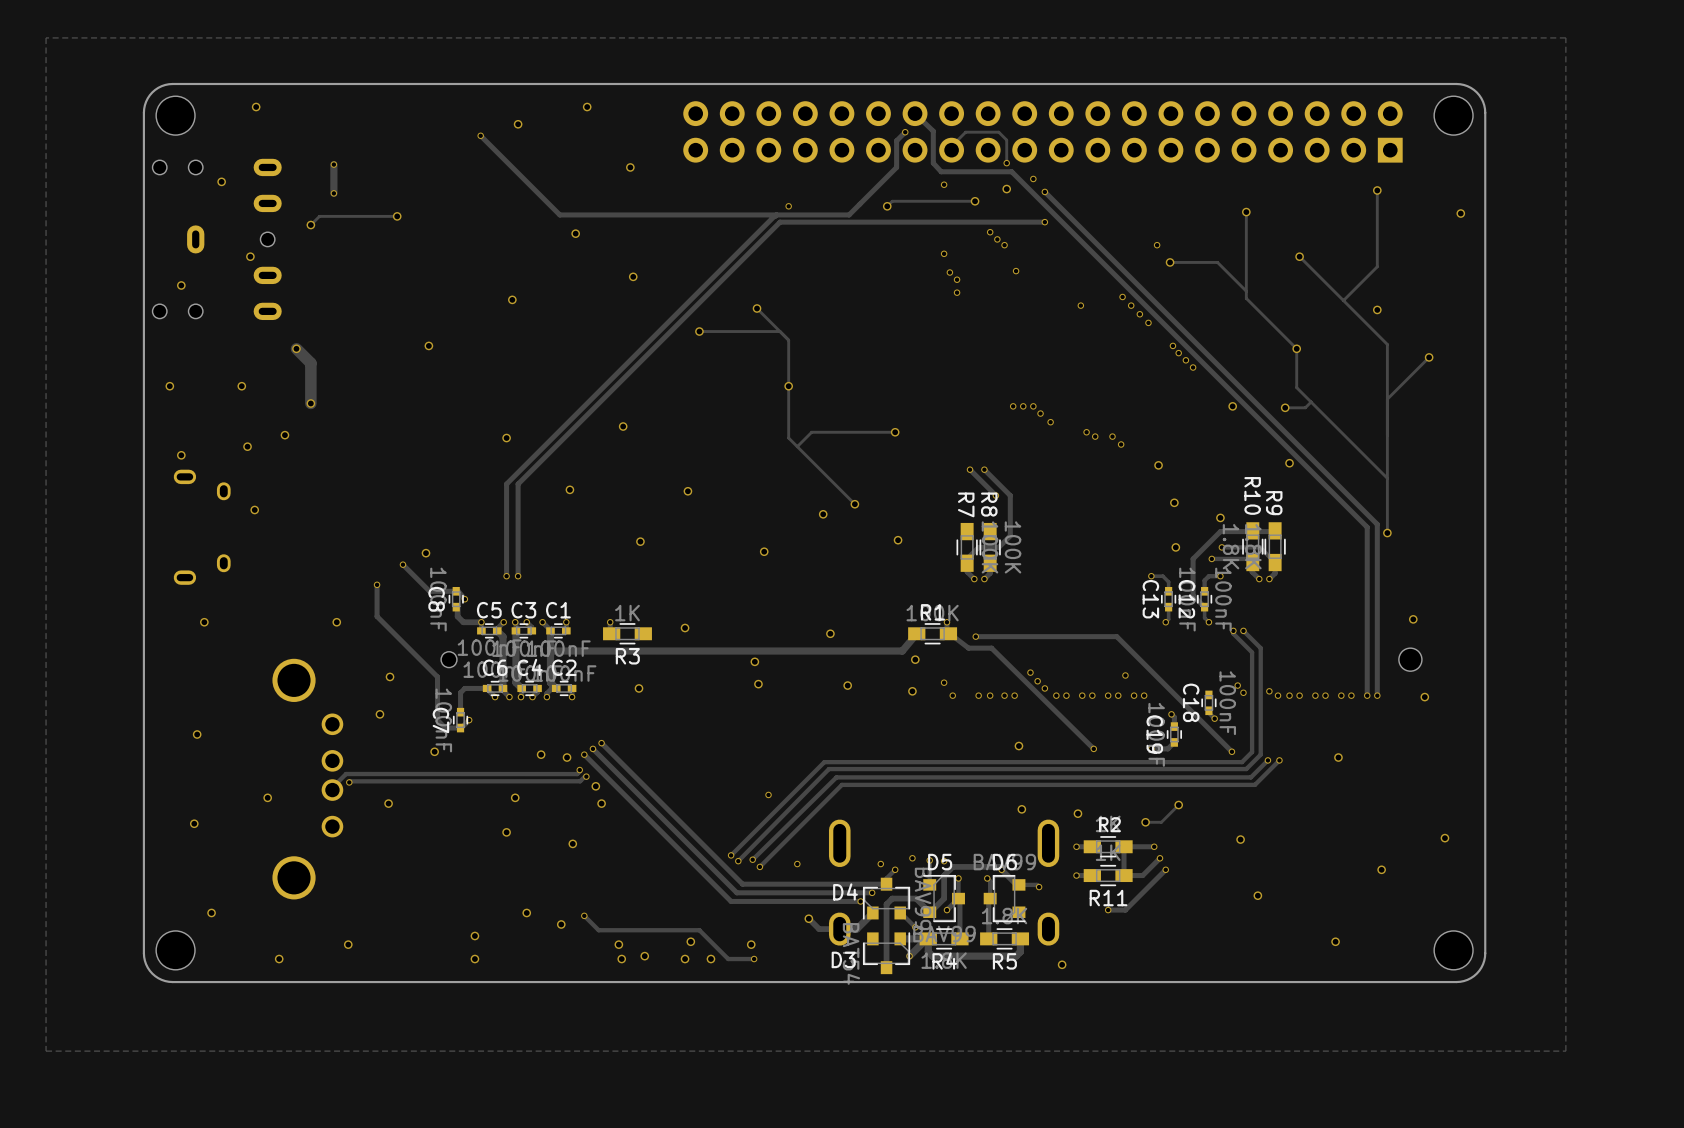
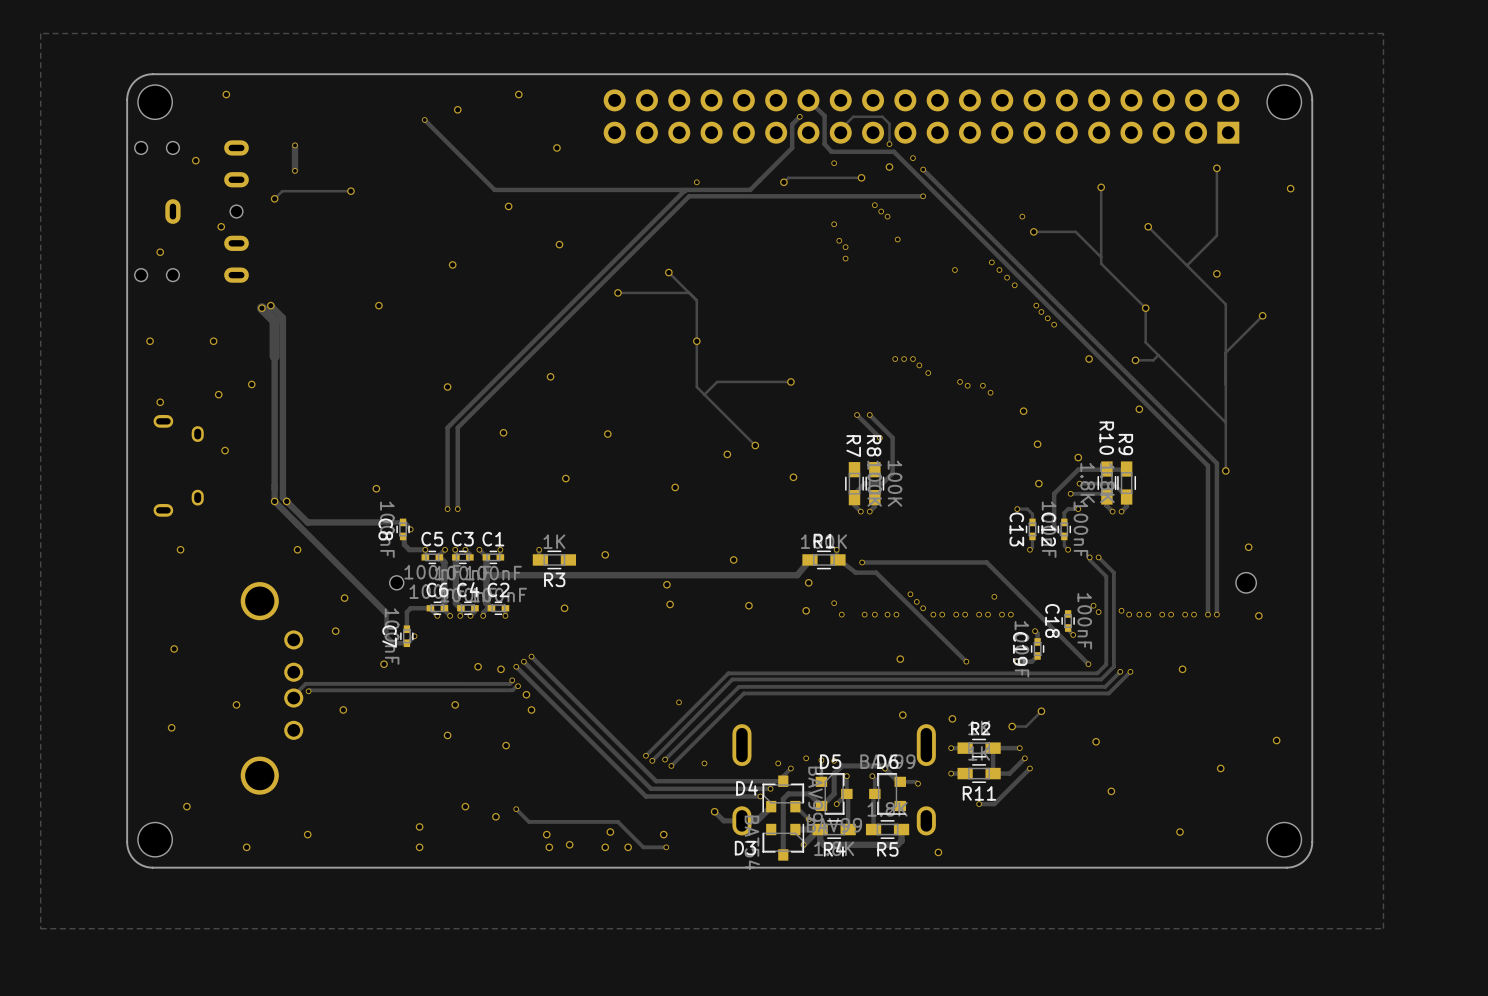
via position: (310, 403) -> (270, 305)
track: (402, 564) (429, 591) -> (270, 305) (282, 317) (282, 497) (307, 522) (379, 522)
via: (402, 564) -> none
via: none -> (274, 501)
via: none -> (286, 501)
track: (377, 584) (377, 616) (437, 676) (437, 694) -> (274, 356) (274, 501) (386, 613)
via: (377, 584) -> none

